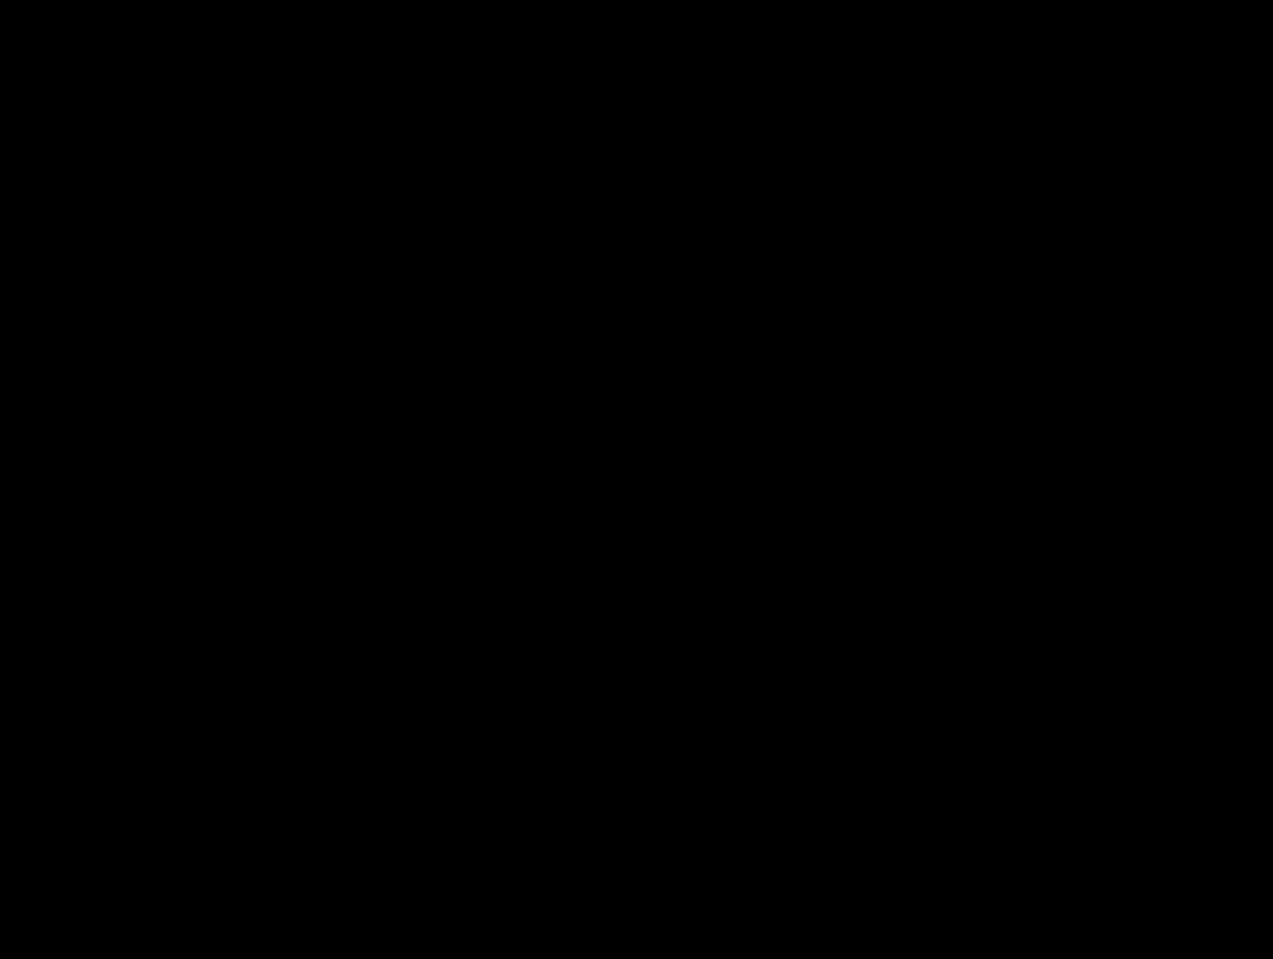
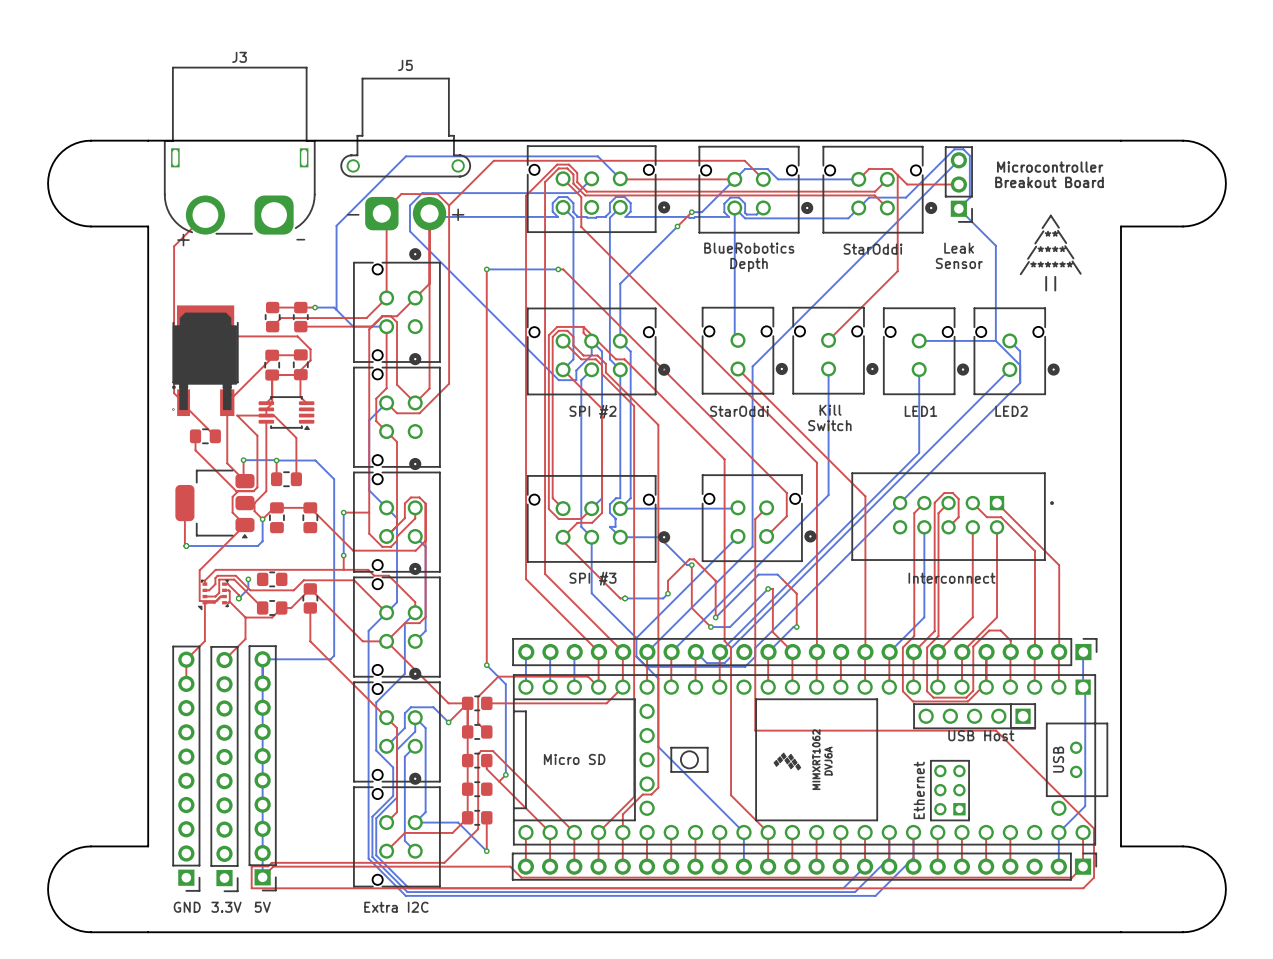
board edge: none -> (90, 140) (1182, 140) (1198, 143) (1207, 148) (1221, 163) (1225, 183) (1223, 198) (1211, 215) (1198, 223) (1188, 226) (1121, 226) (1121, 846) (1188, 846) (1207, 854) (1221, 869) (1225, 884) (1224, 899) (1218, 913) (1202, 927) (1182, 932) (90, 932) (75, 929) (66, 924) (52, 909) (48, 889) (50, 874) (62, 857) (71, 851) (85, 846) (148, 846) (148, 226) (80, 225) (66, 218) (55, 207) (50, 198) (48, 183) (52, 163) (66, 148) (75, 143) (90, 140)
J3: none -> (239, 150)
J5: none -> (405, 154)
bottom track: none -> (958, 160) (752, 366) (752, 546) (647, 652)
text: none -> Microcontroller (1050, 167)
top track: none -> (897, 175) (897, 271) (828, 340)
top track: none -> (563, 178) (581, 197) (581, 226) (816, 462) (816, 687)
bottom track: none -> (591, 178) (577, 193) (422, 193) (409, 205) (409, 231) (558, 380) (576, 380) (576, 370) (591, 355) (591, 341) (602, 351) (602, 498) (591, 508)
top track: none -> (620, 178) (734, 179)
bottom track: none -> (620, 178) (597, 156) (405, 156) (336, 225) (336, 309)
top track: none -> (763, 179) (744, 160) (493, 160) (449, 205)
top track: none -> (858, 179) (869, 169) (891, 169) (907, 184) (958, 184)
bottom track: none -> (858, 179) (778, 179) (767, 169) (745, 169) (701, 212) (691, 212)
top track: none -> (887, 179) (875, 191) (586, 191) (577, 182) (577, 172) (568, 164) (557, 164) (526, 195) (526, 579) (598, 652) (598, 687) (588, 676) (498, 676) (478, 696) (478, 723) (486, 731)
text: none -> Breakout Board (1049, 182)
part: none -> (958, 184)
part: none -> (598, 189)
part: none -> (755, 189)
part: none -> (879, 189)
top track: none -> (449, 205) (449, 383) (419, 413) (397, 413) (386, 402)
top track: none -> (449, 205) (437, 194) (401, 194) (381, 213) (386, 218) (386, 298) (366, 318) (281, 318) (272, 326)
bottom track: none -> (563, 207) (573, 217) (573, 359) (563, 369)
bottom track: none -> (620, 207) (609, 217) (609, 359) (620, 369) (620, 498) (615, 498) (609, 504) (609, 512) (615, 519) (615, 526) (609, 526) (620, 537) (659, 537) (687, 565) (691, 565)
bottom track: none -> (763, 207) (756, 214) (746, 214) (744, 212) (745, 203) (739, 197) (730, 197) (724, 203) (724, 212) (729, 216) (625, 216) (630, 211) (630, 203) (624, 197) (615, 197) (609, 203) (610, 212) (606, 216) (587, 217) (577, 216) (573, 212) (573, 203) (567, 197) (558, 197) (552, 203) (552, 211) (557, 216) (432, 216) (429, 213)
top track: none -> (887, 207) (874, 195) (585, 195) (573, 183) (573, 174) (567, 168) (558, 168) (545, 182) (545, 573) (623, 652) (622, 687) (606, 703) (486, 703)
top track: none -> (691, 212) (677, 226)
via: none -> (691, 212)
top track: none -> (429, 213) (429, 388) (415, 402) (397, 384) (397, 322) (390, 316)
top track: none -> (205, 215) (174, 246) (174, 393) (215, 436)
text: none -> /\ (1050, 221)
bottom track: none -> (677, 226) (620, 283) (620, 341) (630, 351) (630, 498) (620, 508) (737, 507)
via: none -> (677, 226)
text: none -> /**\ (1050, 237)
text: none -> BlueRobotics (749, 248)
text: none -> Leak (959, 248)
text: none -> StarOddi (873, 249)
text: none -> /****\ (1050, 252)
text: none -> Sensor (959, 263)
text: none -> Depth (749, 265)
text: none -> /******\ (1050, 267)
top track: none -> (486, 269) (486, 665)
bottom track: none -> (486, 269) (558, 269)
via: none -> (486, 269)
top track: none -> (558, 269) (563, 269) (786, 492) (786, 516) (766, 536)
via: none -> (558, 269)
top track: none -> (429, 283) (397, 316) (382, 316) (369, 329) (369, 533) (382, 546) (390, 546) (397, 540) (397, 536) (415, 518) (415, 507)
text: none -> || (1050, 283)
part: none -> (396, 305)
top track: none -> (272, 307) (315, 307)
bottom track: none -> (315, 307) (334, 307) (353, 326) (386, 326)
via: none -> (315, 307)
part: none -> (272, 317)
part: none -> (300, 317)
top track: none -> (300, 326) (371, 326)
top track: none -> (386, 326) (386, 388) (376, 398) (376, 421) (397, 441) (397, 526)
top track: none -> (583, 326) (557, 326) (548, 335) (548, 509) (558, 519) (581, 519) (591, 508)
top track: none -> (583, 326) (615, 359) (624, 359) (724, 459) (724, 641) (731, 647) (731, 795) (768, 832)
top track: none -> (583, 326) (583, 333) (591, 341)
top track: none -> (205, 336) (297, 336) (310, 349) (310, 360) (295, 375)
bottom track: none -> (737, 340) (734, 337) (734, 207) (745, 218) (848, 218) (869, 197) (906, 197) (954, 149) (963, 149) (969, 155) (969, 197) (958, 208) (995, 245) (995, 340)
bottom track: none -> (919, 340) (995, 340)
bottom track: none -> (995, 340) (1020, 365)
bottom track: none -> (1009, 340) (1020, 351) (1020, 383) (755, 647) (755, 656) (745, 666) (646, 666)
top track: none -> (563, 341) (581, 359) (595, 359) (602, 365) (602, 374) (634, 406) (634, 796) (598, 832) (598, 866)
part: none -> (744, 350)
part: none -> (835, 350)
part: none -> (598, 351)
part: none -> (926, 351)
part: none -> (1016, 351)
top track: none -> (300, 354) (272, 355) (272, 357) (227, 402) (227, 463) (244, 481)
part: none -> (205, 360)
part: none -> (300, 364)
part: none -> (272, 365)
top track: none -> (737, 368) (865, 496) (865, 687)
bottom track: none -> (828, 368) (828, 495) (671, 652)
top track: none -> (563, 369) (602, 408) (602, 512) (592, 522) (577, 522) (563, 537) (563, 541) (620, 598) (625, 598)
bottom track: none -> (591, 369) (581, 380) (581, 526) (591, 537) (591, 593) (636, 638)
bottom track: none -> (919, 369) (919, 452) (720, 652)
bottom track: none -> (1009, 369) (731, 648) (731, 656) (724, 663) (706, 663) (695, 652)
top track: none -> (300, 375) (272, 375) (272, 403) (266, 409) (266, 415)
top track: none -> (300, 375) (300, 396) (306, 403)
top track: none -> (272, 397) (266, 403)
bottom track: none -> (386, 402) (369, 420) (369, 490) (397, 518) (397, 602) (368, 630) (368, 858) (405, 895) (875, 895) (913, 857) (913, 832)
part: none -> (396, 410)
text: none -> Kill (830, 410)
text: none -> SPI #2 (592, 411)
text: none -> StarOddi (739, 411)
text: none -> LED1 (920, 411)
text: none -> LED2 (1011, 411)
part: none -> (286, 413)
top track: none -> (266, 421) (266, 491) (254, 503) (254, 511) (262, 519) (274, 507) (310, 507) (353, 550) (415, 550) (425, 540)
text: none -> Switch (829, 425)
top track: none -> (195, 436) (195, 450) (236, 491) (253, 491) (257, 487) (257, 435) (237, 415) (274, 415) (296, 437) (296, 479)
part: none -> (205, 436)
top track: none -> (243, 460) (243, 479)
bottom track: none -> (243, 460) (315, 460) (334, 479) (334, 655) (330, 659) (262, 659) (262, 877)
via: none -> (243, 460)
top track: none -> (276, 460) (276, 479)
via: none -> (276, 460)
part: none -> (286, 479)
top track: none -> (238, 491) (232, 496) (232, 512) (244, 525) (199, 570) (199, 601) (216, 601)
top track: none -> (184, 503) (186, 545)
top track: none -> (924, 503) (914, 513) (914, 636) (902, 647) (902, 691) (913, 701) (967, 701) (986, 682) (986, 652) (986, 652) (986, 687)
top track: none -> (948, 503) (938, 513) (938, 636) (927, 647) (927, 691) (933, 697) (966, 697) (973, 690) (973, 646) (989, 630) (1000, 630) (1010, 640) (1010, 687)
top track: none -> (972, 503) (986, 517) (1001, 517) (1034, 551) (1034, 687)
top track: none -> (997, 503) (1059, 565) (1058, 687)
part: none -> (214, 504)
top track: none -> (766, 507) (755, 519) (755, 730) (996, 730) (1094, 828) (1094, 877) (1083, 888) (251, 888) (251, 866) (268, 866) (271, 862) (444, 862) (478, 829) (478, 754) (481, 751) (492, 751) (574, 832)
top track: none -> (563, 508) (552, 498) (552, 336) (558, 330) (567, 330) (573, 336) (573, 345) (583, 355) (597, 355) (605, 363) (605, 372) (658, 424) (658, 787) (651, 794) (642, 794) (622, 814) (622, 832)
top track: none -> (343, 512) (369, 512)
bottom track: none -> (343, 512) (343, 555)
via: none -> (343, 512)
part: none -> (396, 515)
part: none -> (952, 516)
part: none -> (276, 517)
part: none -> (310, 517)
part: none -> (598, 518)
part: none -> (759, 518)
bottom track: none -> (262, 519) (262, 541) (257, 545) (186, 545)
via: none -> (262, 519)
bottom track: none -> (924, 527) (924, 617) (889, 652)
top track: none -> (948, 527) (958, 517) (958, 498) (952, 493) (944, 493) (934, 502) (934, 631) (913, 652) (913, 687)
top track: none -> (972, 527) (972, 617) (937, 652) (937, 687)
top track: none -> (997, 527) (997, 617) (962, 652) (962, 687)
top track: none -> (386, 536) (404, 518) (404, 503) (410, 497) (419, 497) (425, 503) (425, 617) (419, 623) (404, 623) (386, 641)
bottom track: none -> (415, 536) (425, 546) (425, 630) (415, 641)
bottom track: none -> (737, 536) (636, 638)
via: none -> (186, 545)
top track: none -> (343, 555) (343, 569)
via: none -> (343, 555)
top track: none -> (691, 565) (691, 607) (710, 627)
via: none -> (691, 565)
text: none -> SPI #3 (592, 578)
text: none -> Interconnect (952, 578)
bottom track: none -> (248, 579) (248, 588) (238, 598)
via: none -> (248, 579)
part: none -> (272, 579)
top track: none -> (782, 579) (796, 593) (796, 627)
bottom track: none -> (782, 579) (777, 574) (758, 574) (715, 617)
top track: none -> (204, 584) (204, 580) (215, 569) (368, 569) (374, 575) (388, 575) (415, 602) (415, 612)
top track: none -> (224, 584) (227, 584) (238, 594) (238, 598)
top track: none -> (768, 588) (772, 588) (772, 632) (792, 652) (792, 687)
bottom track: none -> (768, 588) (729, 627) (710, 627)
via: none -> (768, 588)
top track: none -> (204, 590) (209, 590) (215, 584) (215, 578) (217, 575) (235, 575) (250, 590) (293, 590) (303, 580) (354, 580) (386, 612)
top track: none -> (224, 590) (229, 591) (229, 601)
top track: none -> (667, 593) (667, 580) (689, 559) (694, 559) (715, 580) (715, 617)
bottom track: none -> (667, 593) (663, 598) (625, 598)
via: none -> (667, 593)
part: none -> (213, 595)
top track: none -> (204, 596) (215, 596) (219, 592) (219, 579) (234, 579) (262, 607)
top track: none -> (224, 596) (220, 596) (214, 602) (204, 602) (204, 641) (186, 659) (186, 683)
via: none -> (238, 598)
part: none -> (310, 598)
via: none -> (625, 598)
top track: none -> (229, 601) (224, 602)
top track: none -> (229, 601) (245, 617)
part: none -> (272, 607)
top track: none -> (310, 607) (310, 641) (397, 728) (397, 812) (386, 822)
bottom track: none -> (415, 612) (404, 623) (404, 673) (376, 702) (376, 750) (393, 767) (393, 795) (372, 816) (372, 857) (407, 892) (855, 892) (889, 857) (889, 832)
top track: none -> (245, 617) (245, 639) (224, 660)
top track: none -> (245, 617) (272, 617) (281, 607) (291, 607) (310, 588) (362, 641) (386, 641)
via: none -> (715, 617)
part: none -> (396, 620)
via: none -> (710, 627)
bottom track: none -> (796, 627) (793, 627) (768, 652)
via: none -> (796, 627)
bottom track: none -> (636, 638) (636, 656) (658, 678) (658, 746) (743, 832)
top track: none -> (386, 641) (448, 703) (467, 703)
bottom track: none -> (526, 652) (525, 687)
bottom track: none -> (550, 652) (550, 687)
bottom track: none -> (574, 652) (574, 687)
top track: none -> (647, 652) (647, 687)
top track: none -> (671, 652) (671, 687)
top track: none -> (695, 652) (695, 687)
top track: none -> (720, 652) (719, 687)
top track: none -> (768, 652) (768, 687)
part: none -> (804, 652)
top track: none -> (841, 652) (840, 687)
top track: none -> (889, 652) (889, 687)
bottom track: none -> (1083, 652) (1085, 806) (1058, 832) (1058, 866)
bottom track: none -> (486, 665) (505, 684) (505, 774)
via: none -> (486, 665)
top track: none -> (467, 703) (467, 817) (452, 832) (404, 832) (386, 851)
top track: none -> (467, 703) (448, 722)
part: none -> (477, 703)
bottom track: none -> (448, 722) (433, 707) (410, 707) (404, 713) (404, 728) (386, 746)
via: none -> (448, 722)
part: none -> (396, 725)
part: none -> (477, 731)
bottom track: none -> (415, 746) (404, 756) (404, 840) (415, 851)
part: none -> (810, 759)
part: none -> (477, 760)
top track: none -> (486, 760) (486, 769) (550, 832)
part: none -> (186, 768)
part: none -> (262, 768)
part: none -> (224, 769)
top track: none -> (505, 774) (499, 781)
via: none -> (505, 774)
part: none -> (477, 789)
part: none -> (477, 817)
top track: none -> (486, 817) (486, 851)
part: none -> (396, 829)
top track: none -> (525, 832) (525, 866)
top track: none -> (550, 832) (550, 866)
top track: none -> (574, 832) (574, 866)
top track: none -> (622, 832) (622, 866)
top track: none -> (646, 832) (646, 866)
top track: none -> (671, 832) (671, 866)
top track: none -> (695, 832) (695, 866)
top track: none -> (719, 832) (719, 866)
bottom track: none -> (743, 832) (743, 866)
top track: none -> (768, 832) (768, 866)
top track: none -> (792, 832) (792, 866)
top track: none -> (816, 832) (816, 866)
top track: none -> (840, 832) (840, 866)
top track: none -> (865, 832) (865, 866)
top track: none -> (889, 832) (889, 866)
top track: none -> (913, 832) (913, 866)
top track: none -> (937, 832) (937, 866)
top track: none -> (961, 832) (961, 866)
top track: none -> (986, 832) (986, 866)
top track: none -> (1010, 832) (1010, 866)
top track: none -> (1083, 832) (1083, 866) (1072, 877) (521, 877) (510, 866) (273, 866) (262, 877)
bottom track: none -> (486, 851) (458, 822) (415, 822) (425, 812) (425, 728) (415, 717) (415, 731) (397, 749) (397, 797) (376, 818) (376, 855) (408, 888) (843, 888) (865, 866)
via: none -> (486, 851)
part: none -> (804, 866)
text: none -> GND (187, 907)
text: none -> 3.3V (226, 907)
text: none -> 5V (262, 907)
text: none -> Extra I2C (396, 907)

